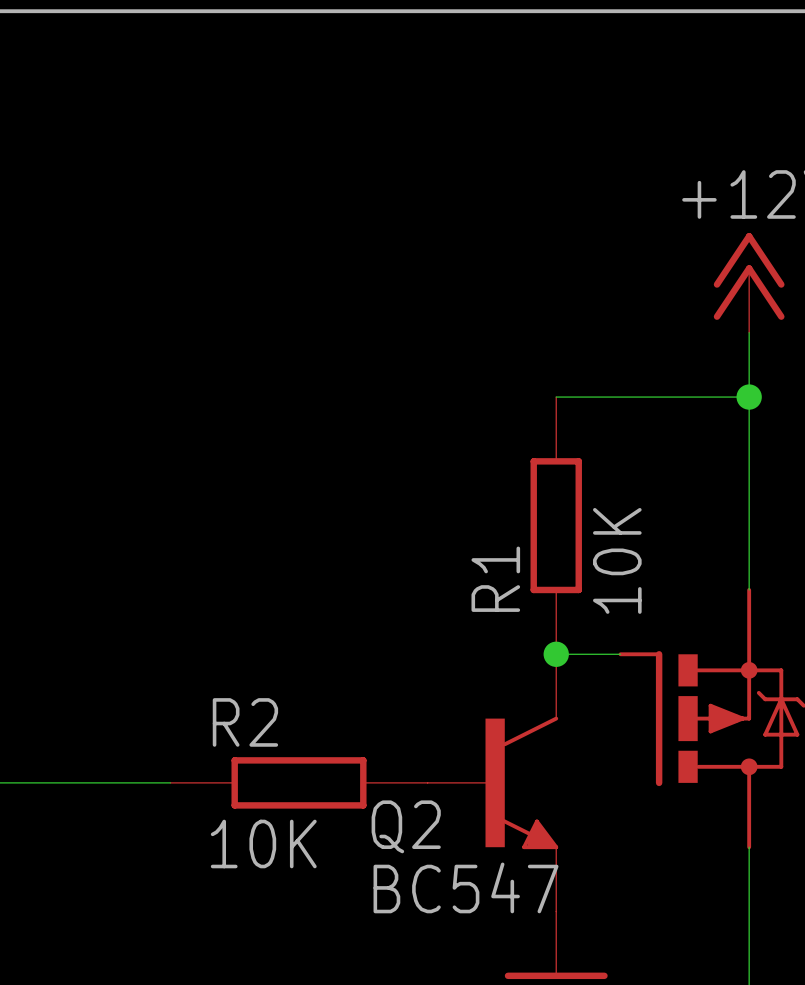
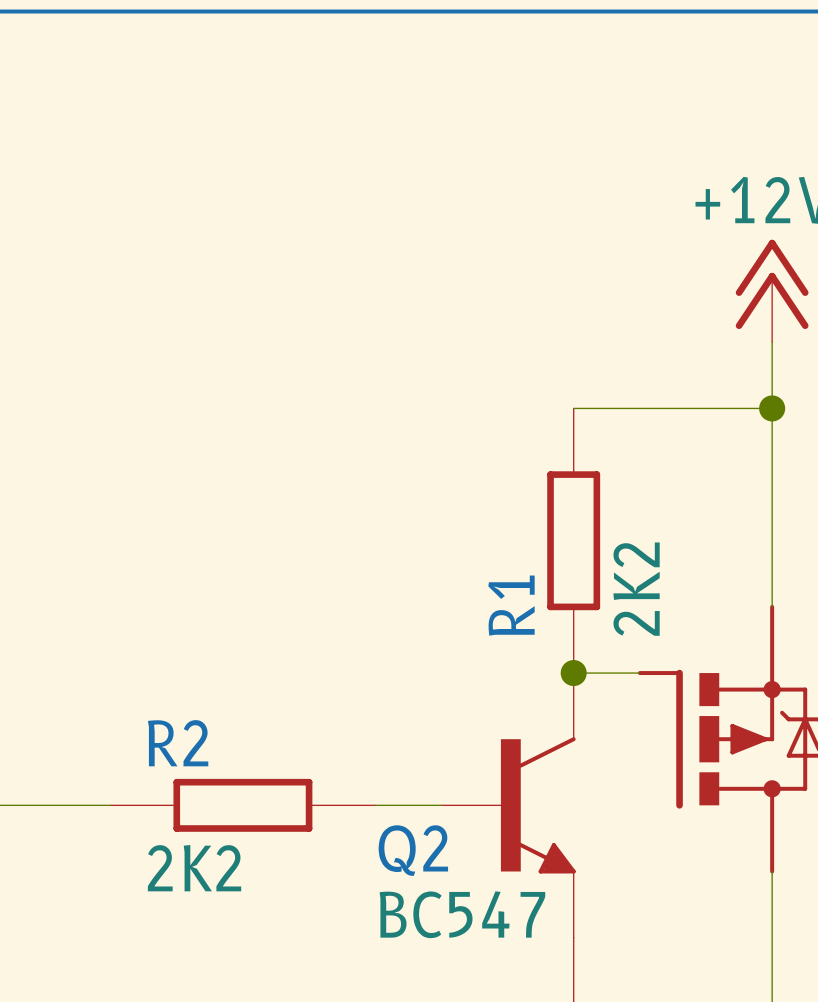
R1 value: 10K (617, 560) -> 2K2 (636, 589)
R2 position: (299, 782) -> (242, 805)
R2 value: 10K (263, 843) -> 2K2 (194, 868)

